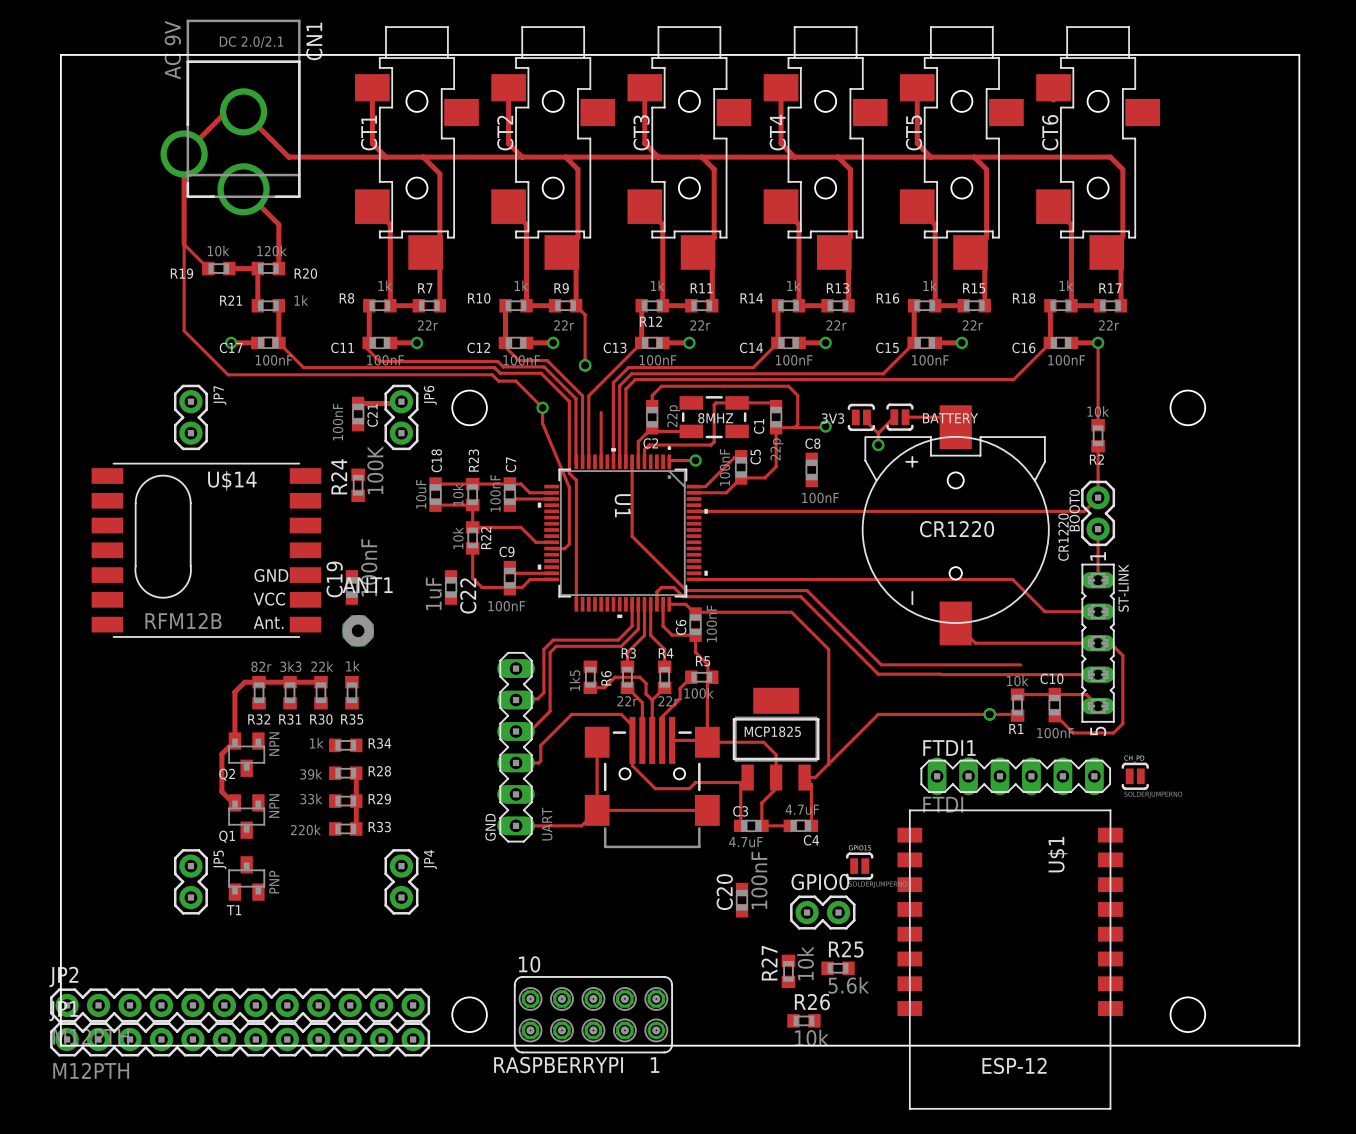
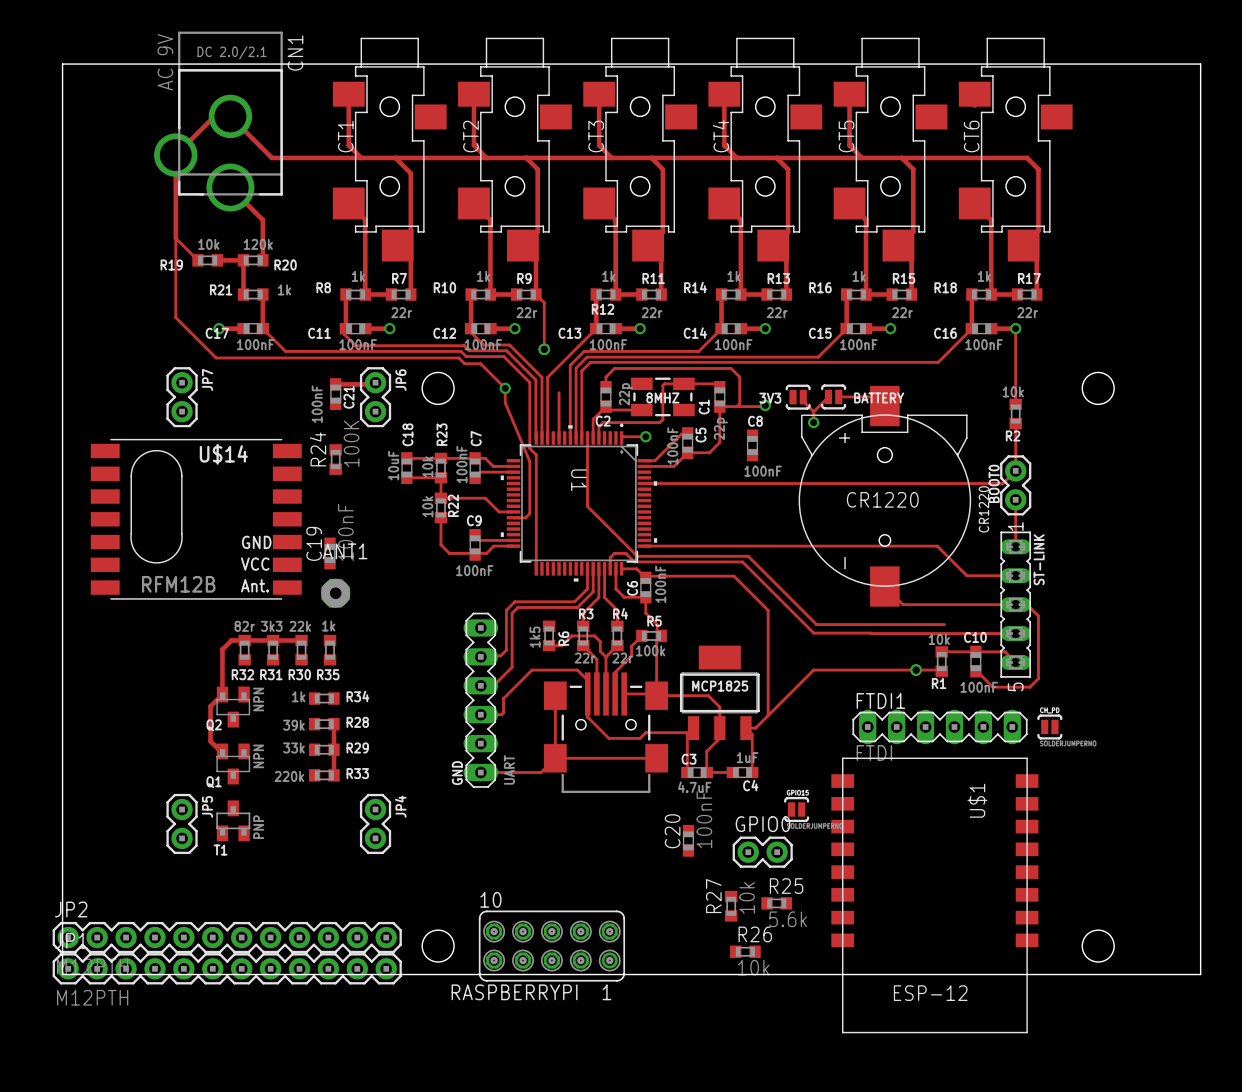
C22: 1uF (451, 587) -> none
C4 value: 4.7uF (802, 809) -> 1uF (747, 757)

